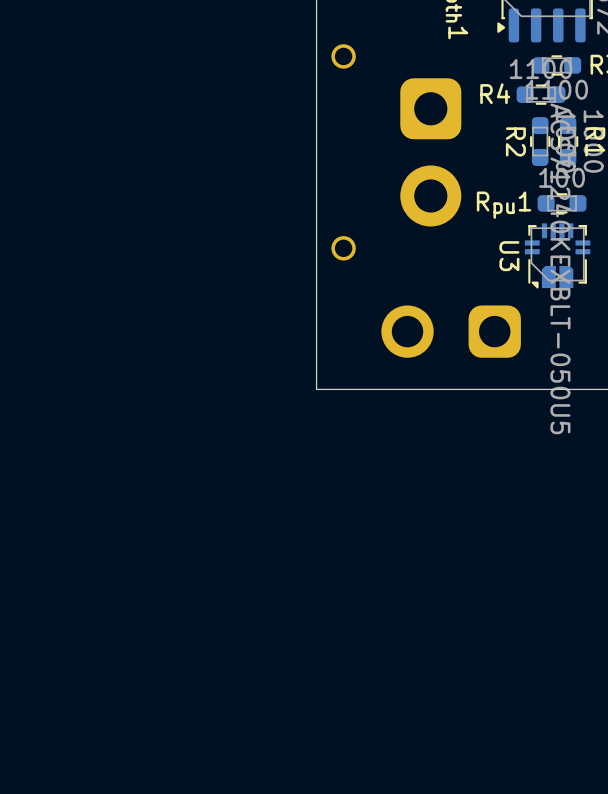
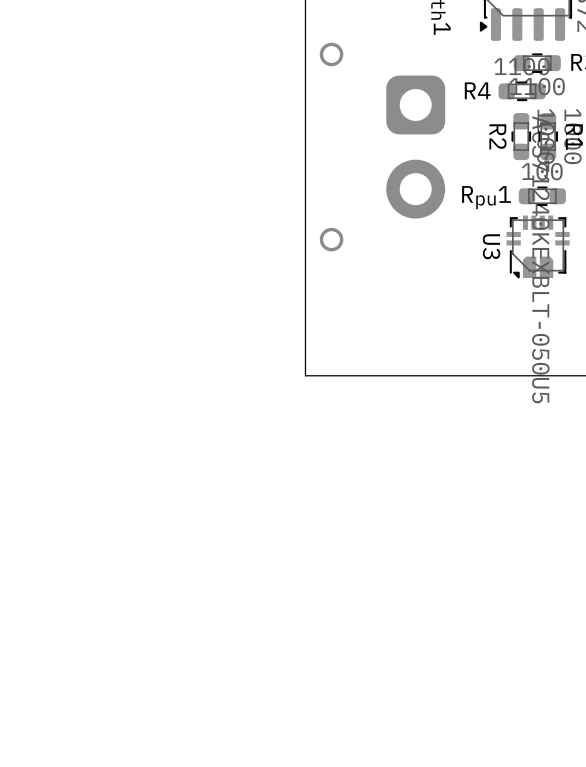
part: (451, 331) -> none

